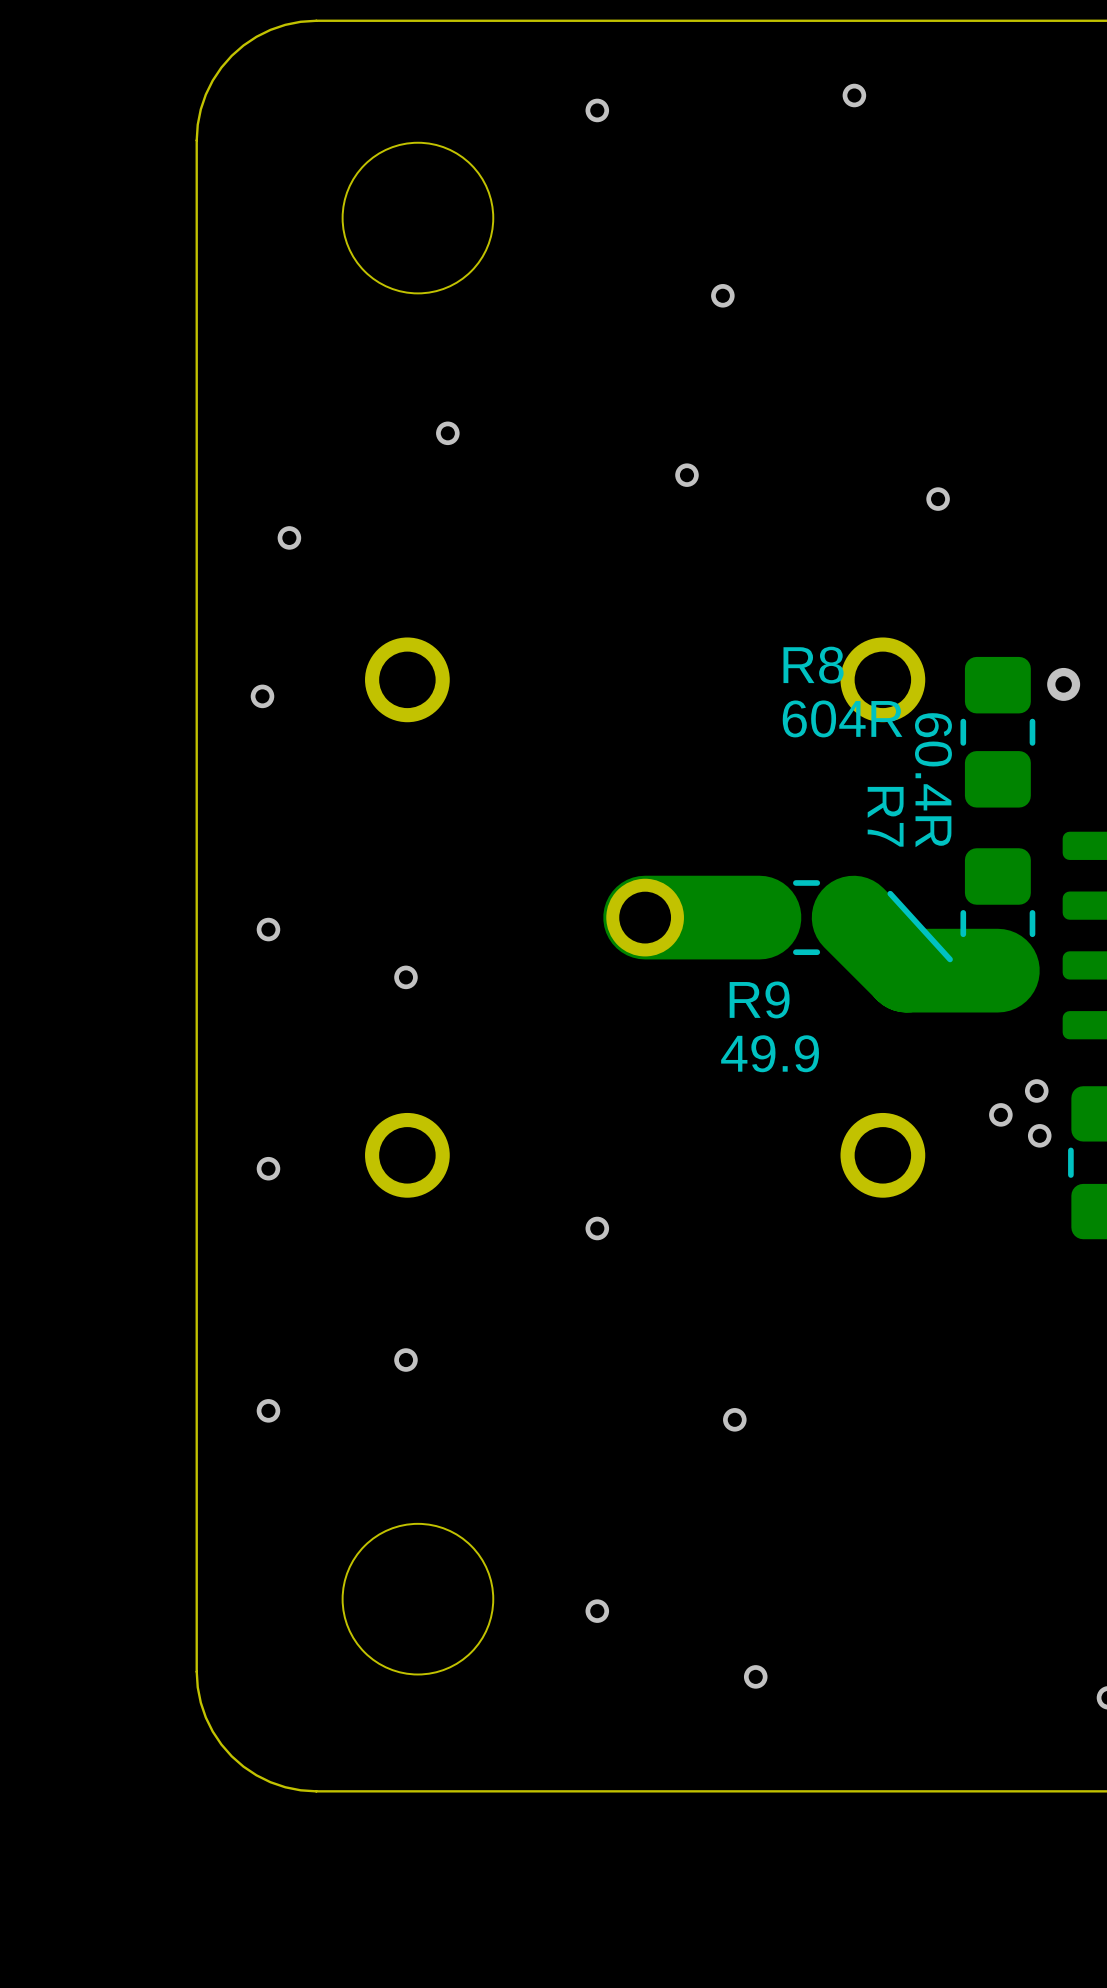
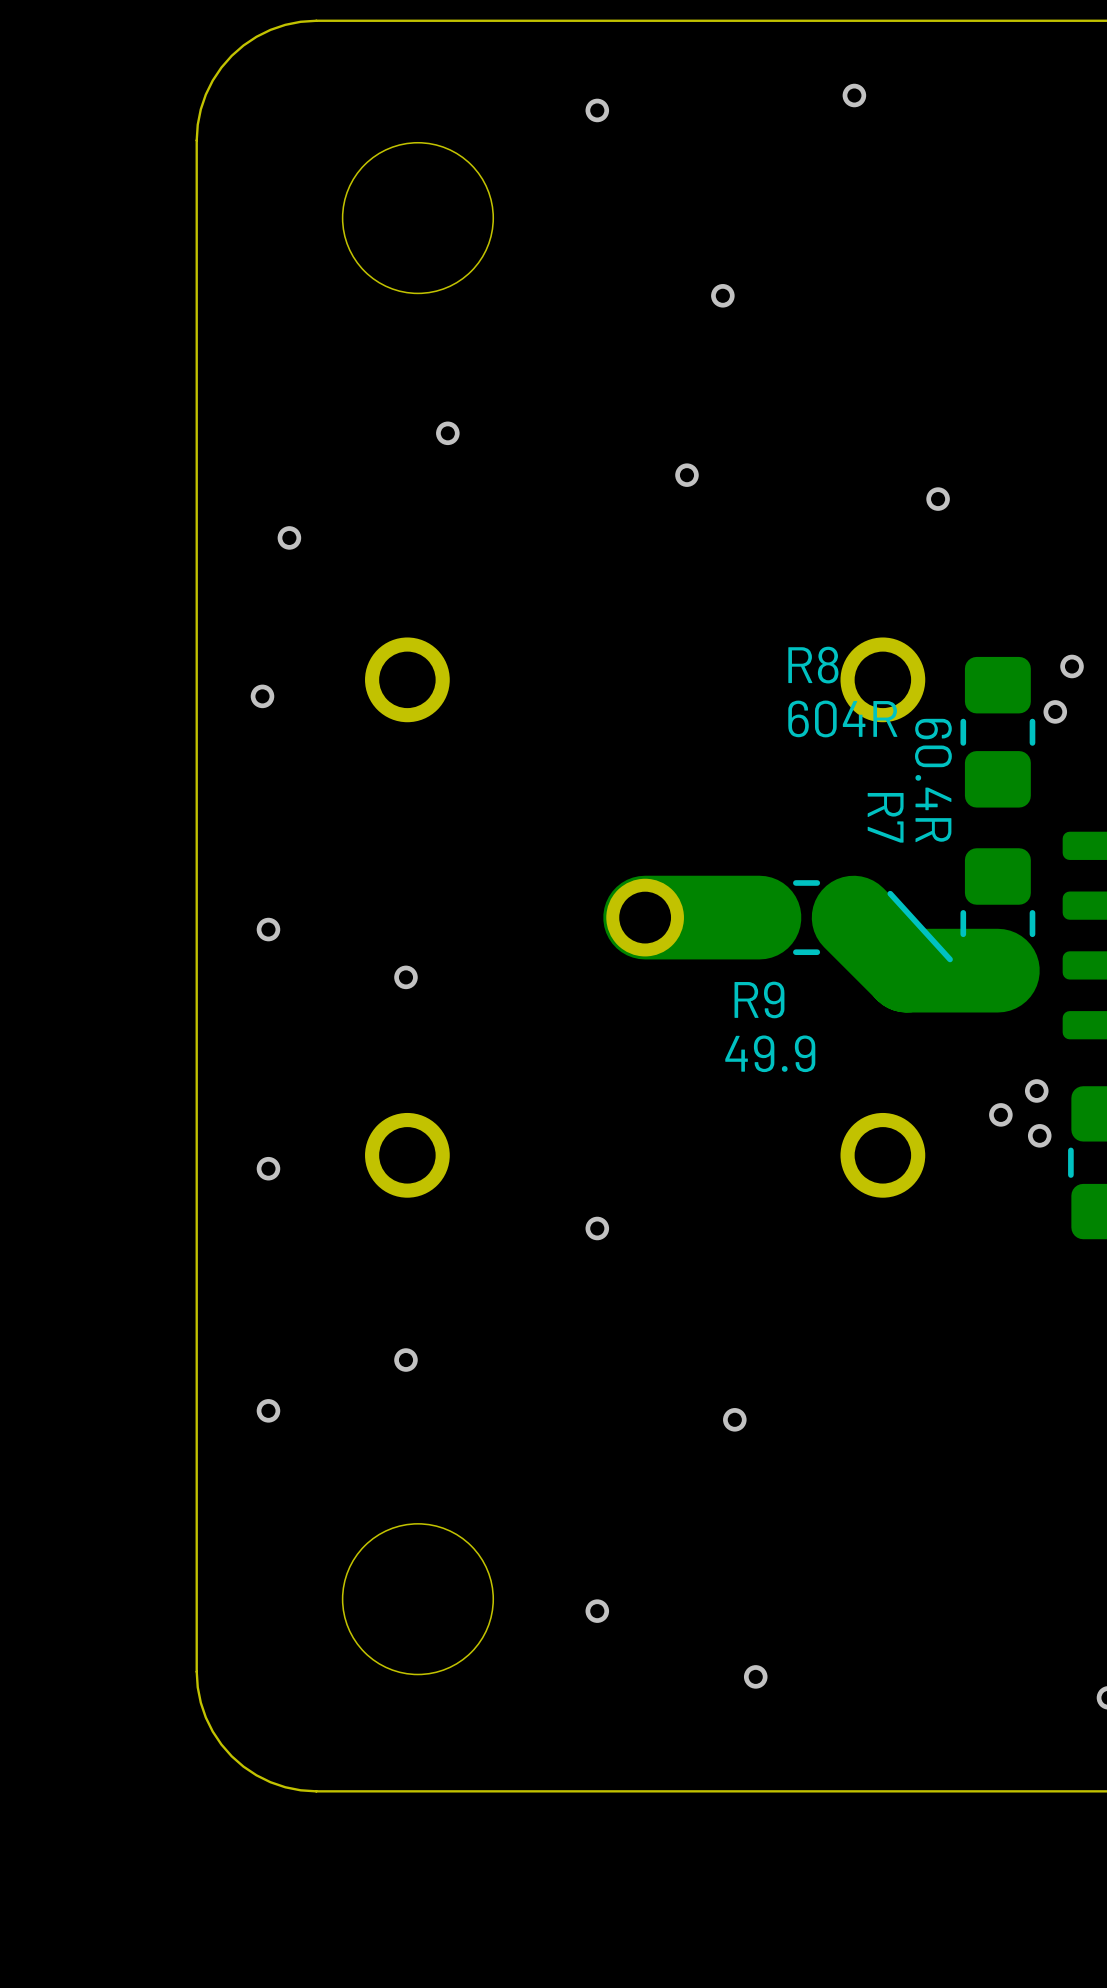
via: none -> (1072, 666)
via: (1063, 684) -> none
via: none -> (1055, 711)

